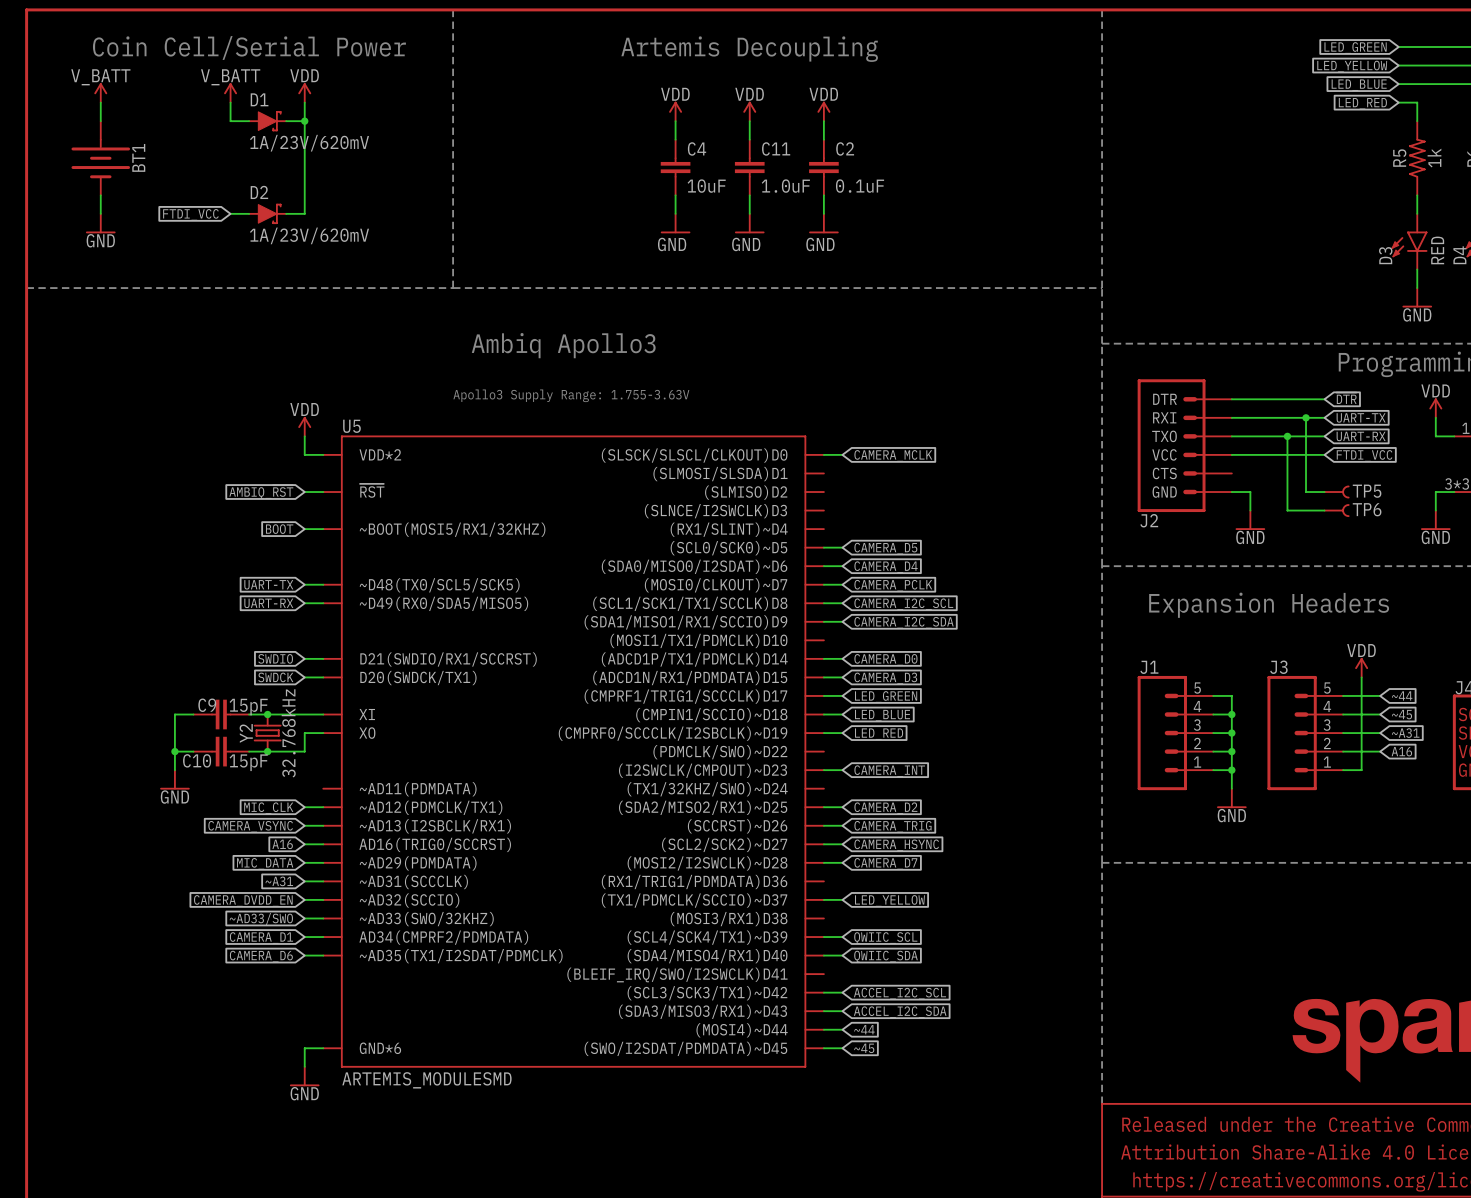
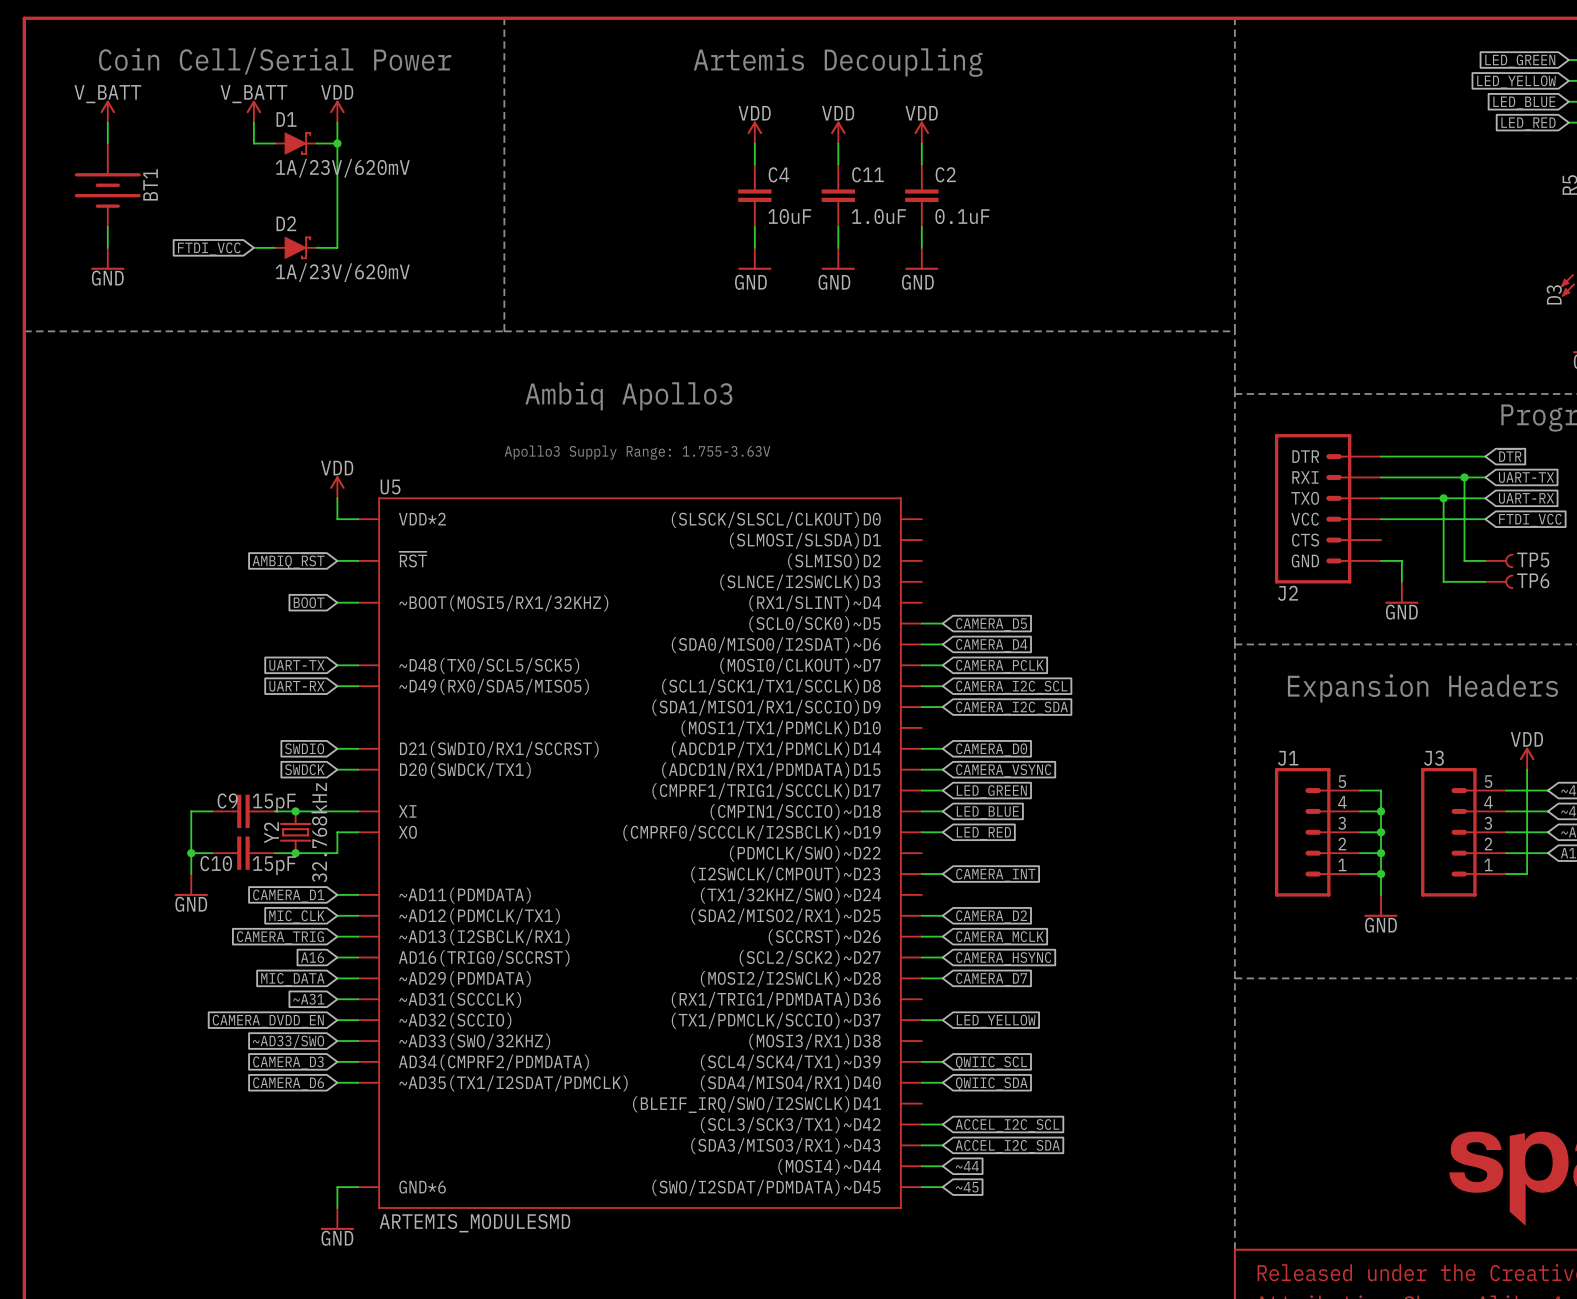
wire: (823, 454) (842, 454) -> none
global label: CAMERA_MCLK (893, 455) -> none
global label: CAMERA_D3 (885, 678) -> CAMERA_VSYNC (1003, 770)
wire: none -> (337, 894) (358, 894)
global label: none -> CAMERA_D1 (288, 896)
global label: CAMERA_VSYNC (250, 826) -> CAMERA_TRIG (280, 937)
global label: CAMERA_TRIG (892, 826) -> CAMERA_MCLK (999, 937)
global label: CAMERA_D1 (261, 938) -> CAMERA_D3 (288, 1063)

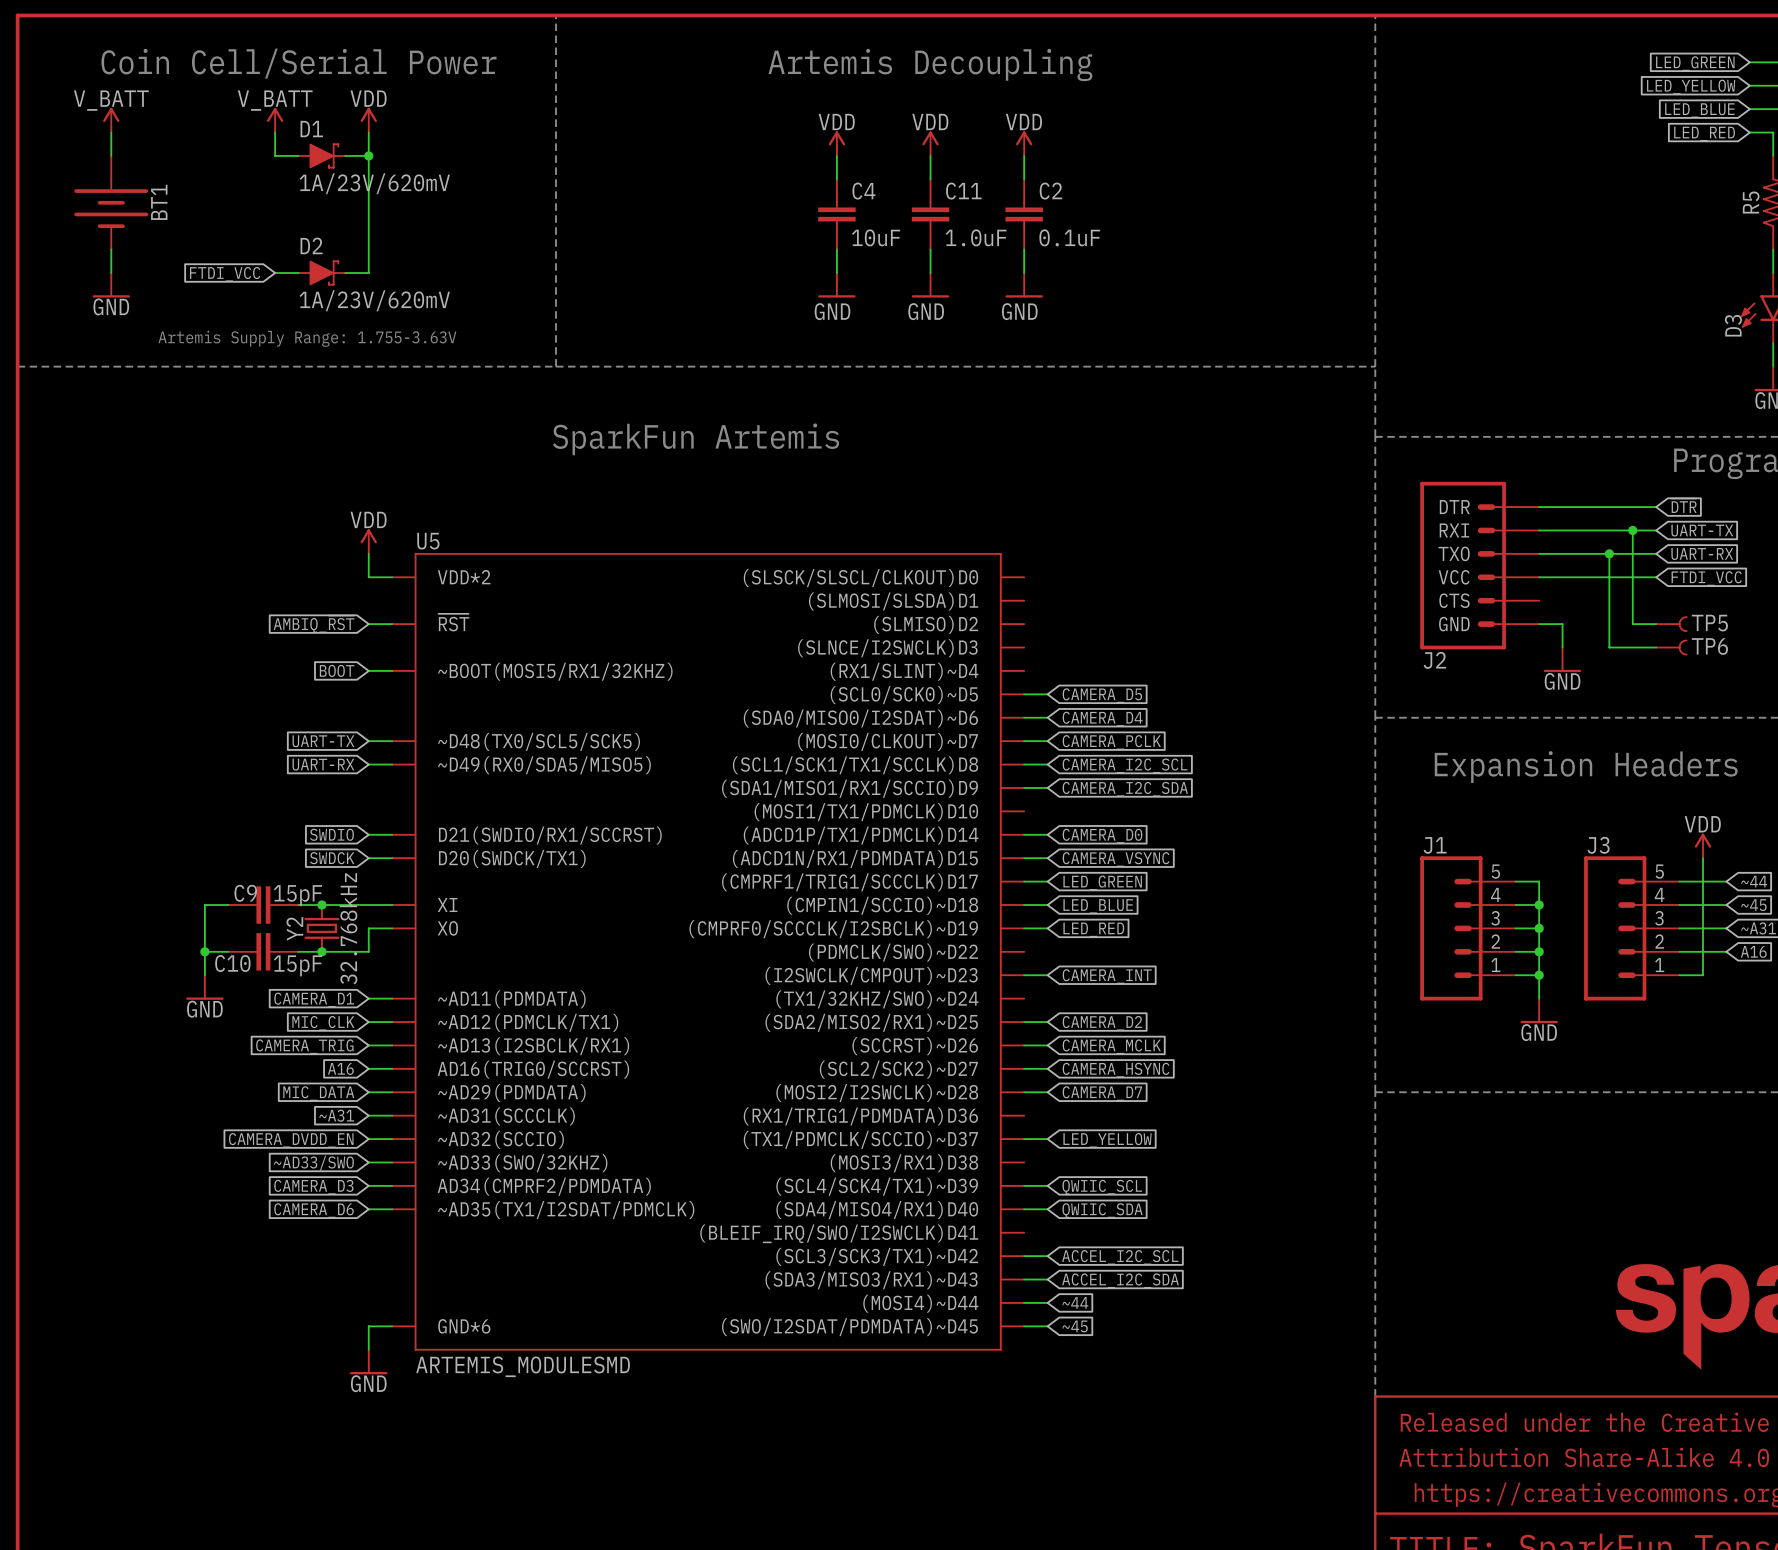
text: none -> Artemis Supply Range: 1.755-3.63V (307, 338)
text: Ambiq Apollo3 (628, 396) -> SparkFun Artemis (696, 439)
text: Apollo3 Supply Range: 1.755-3.63V (637, 452) -> none

